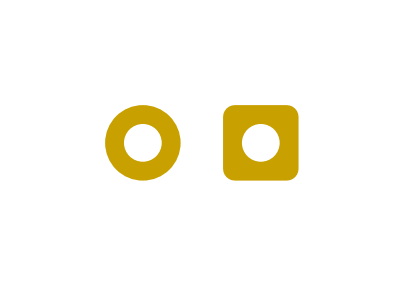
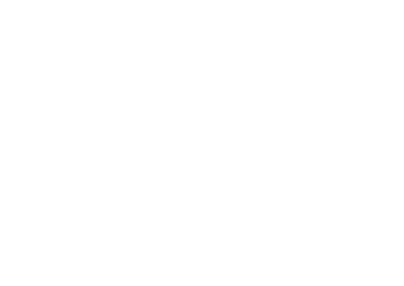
part: (201, 142) -> none

